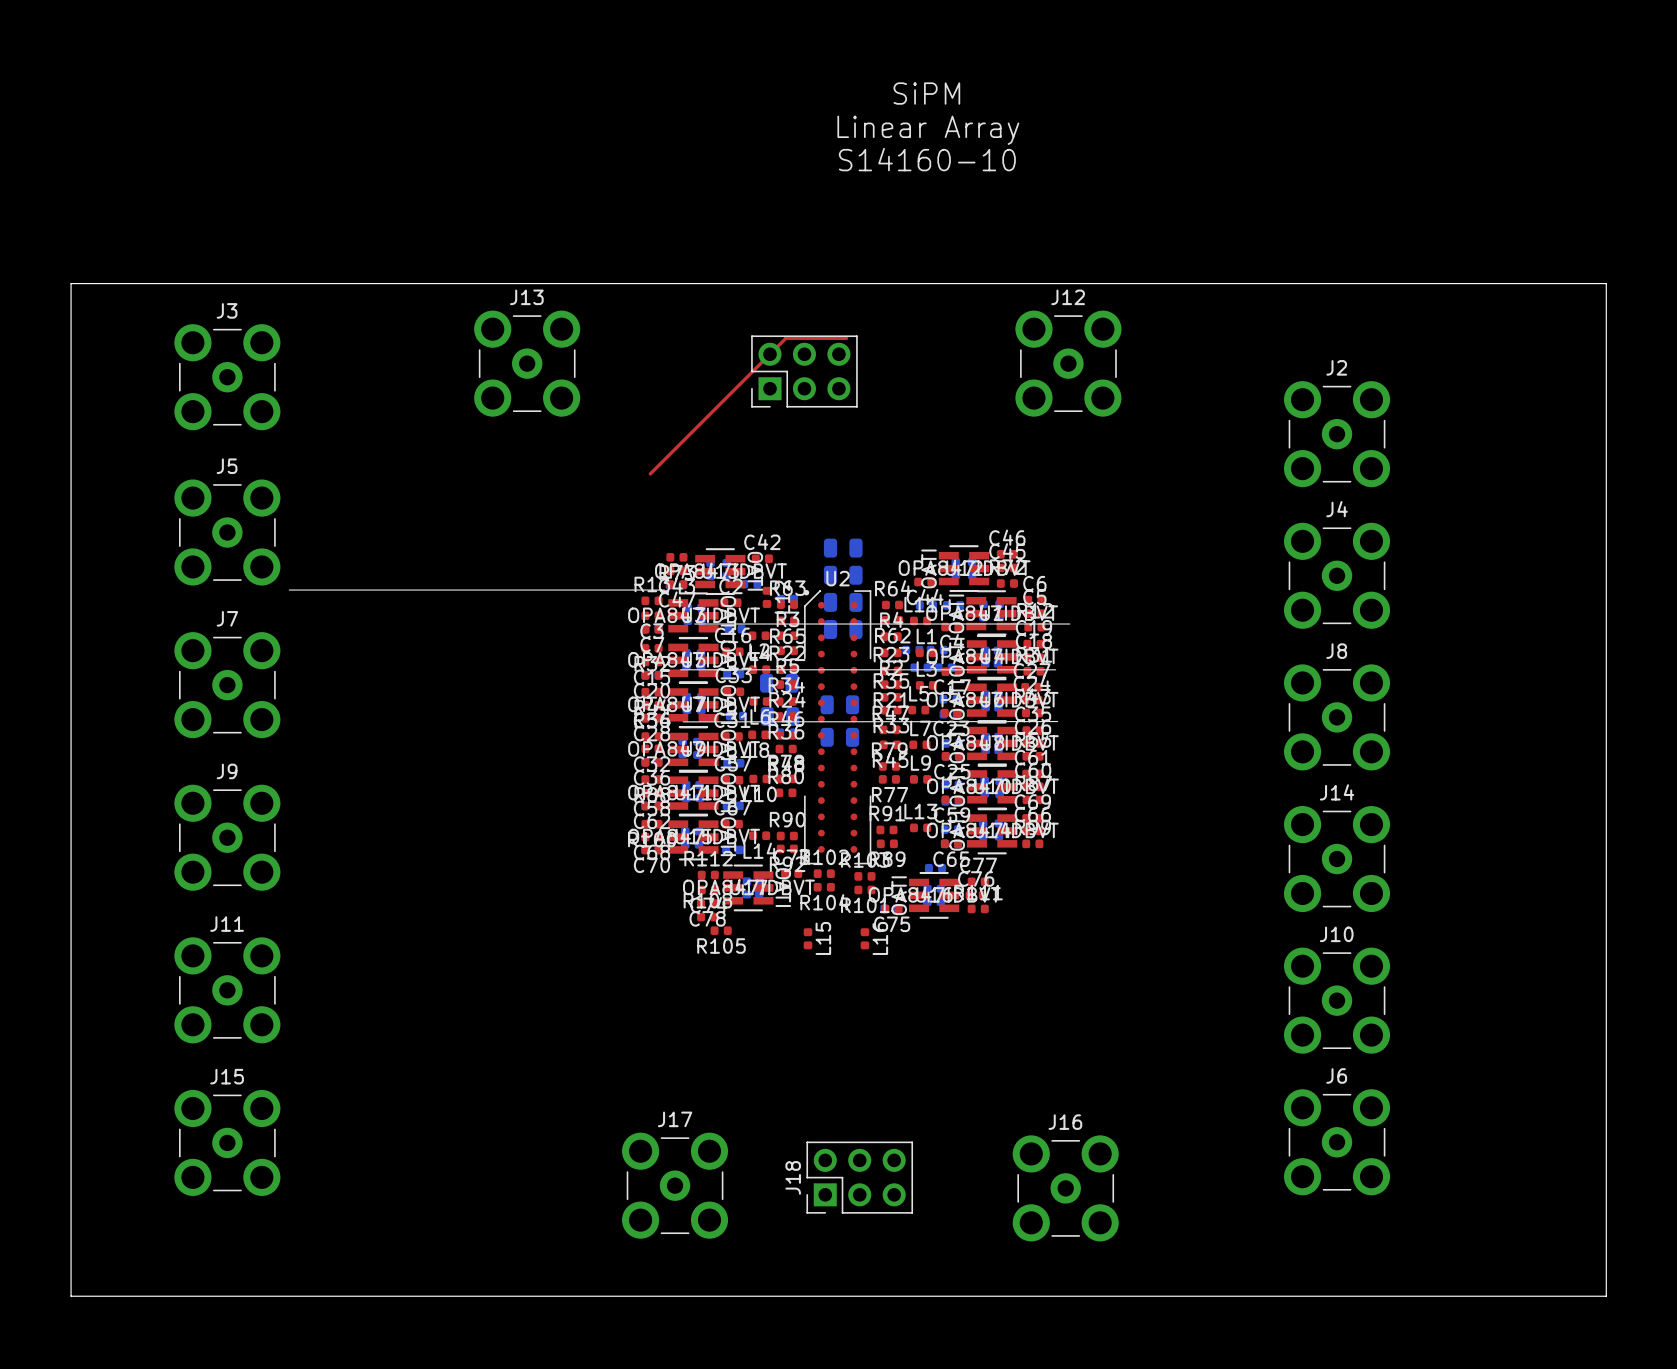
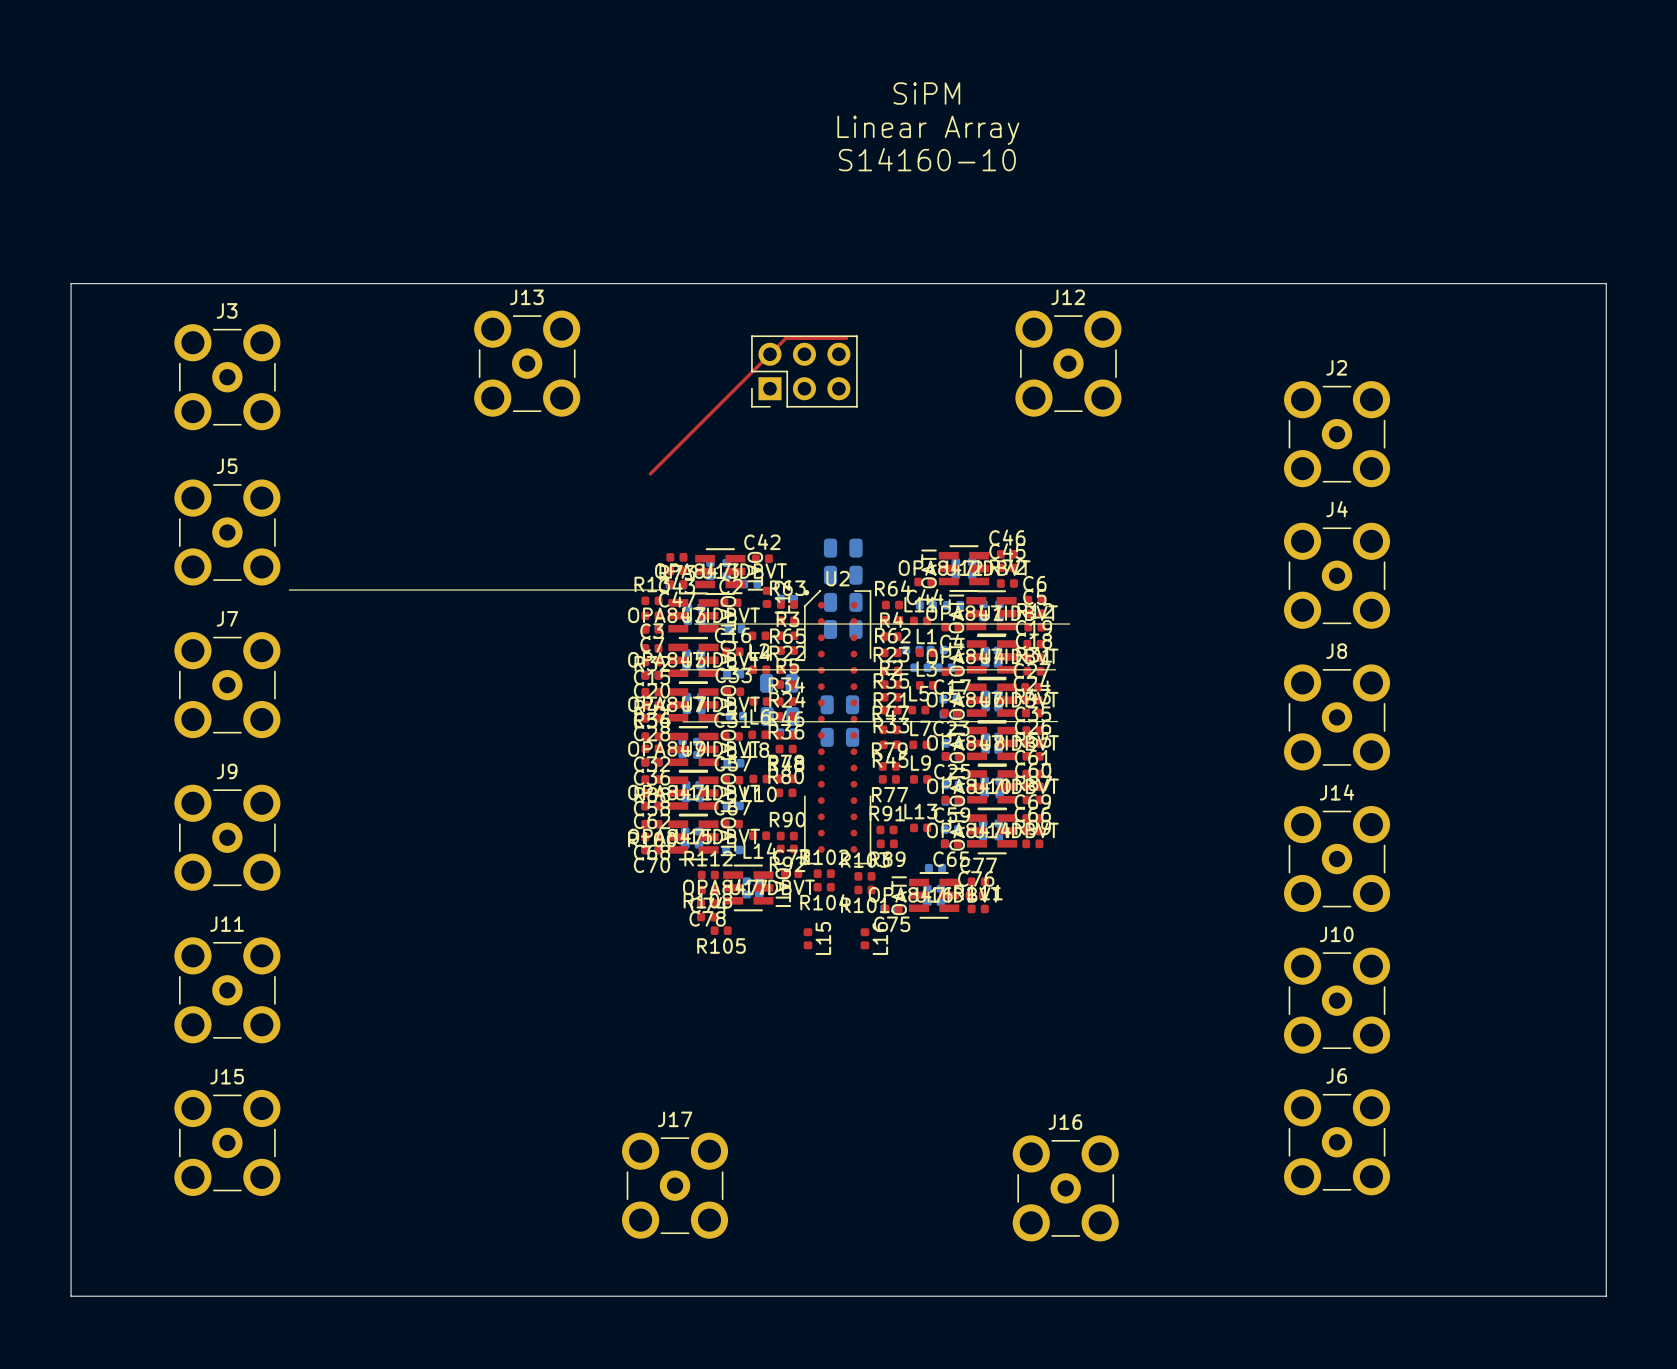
J18: (859, 1177) -> none

